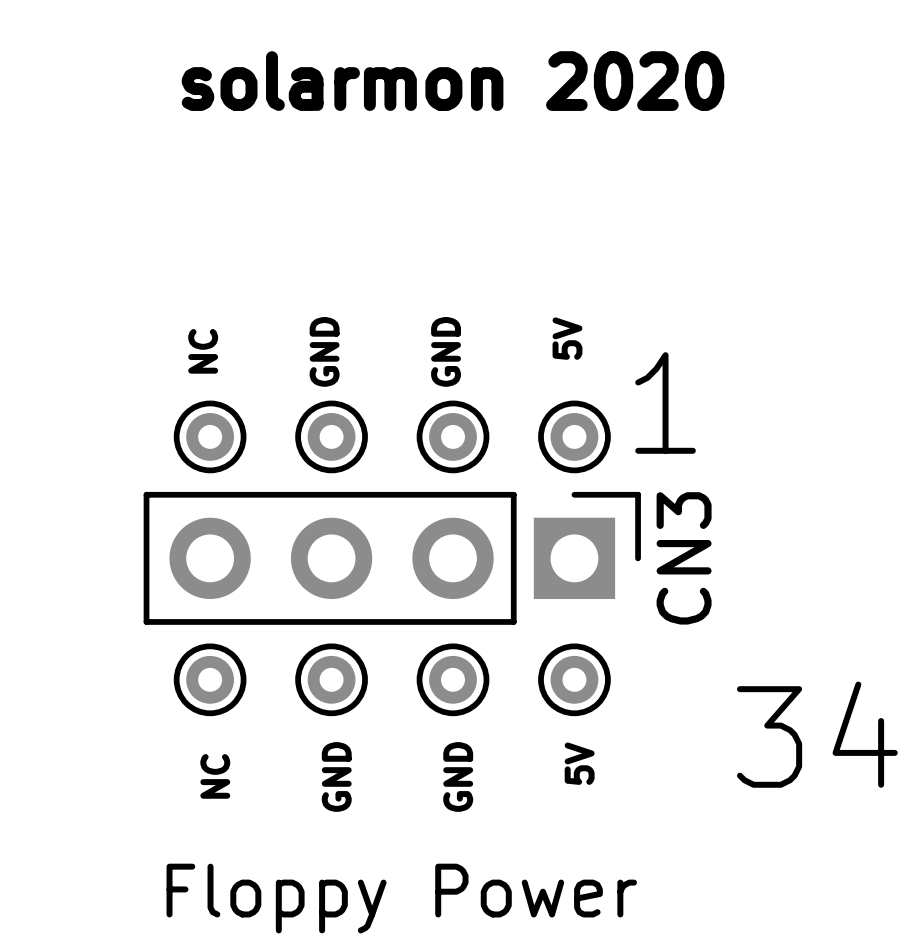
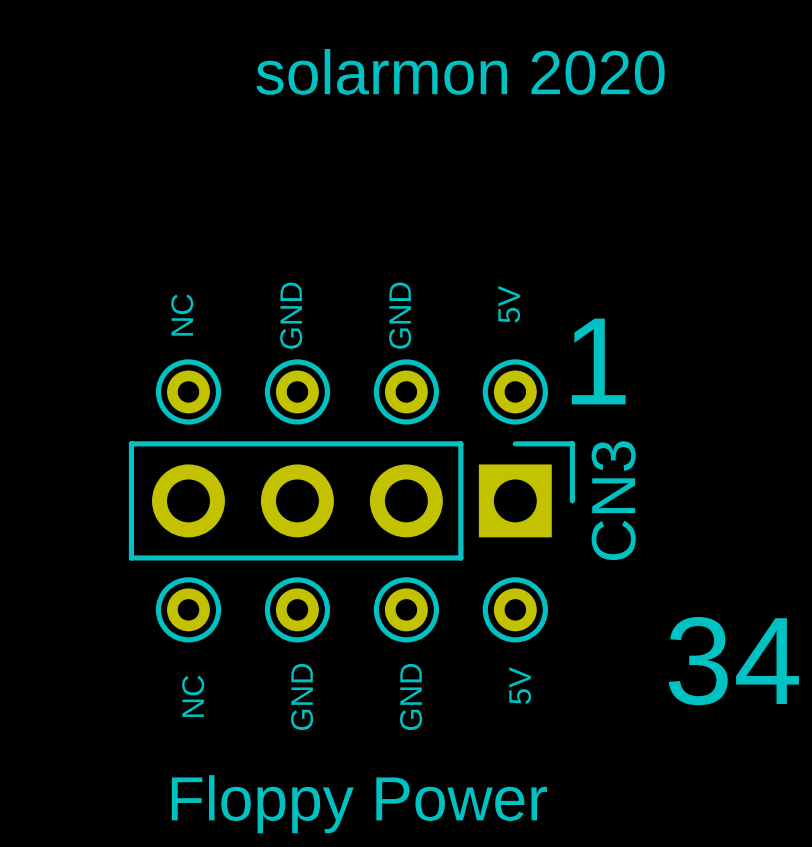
text position: solarmon 2020 (453, 81) -> solarmon 2020 (460, 71)

